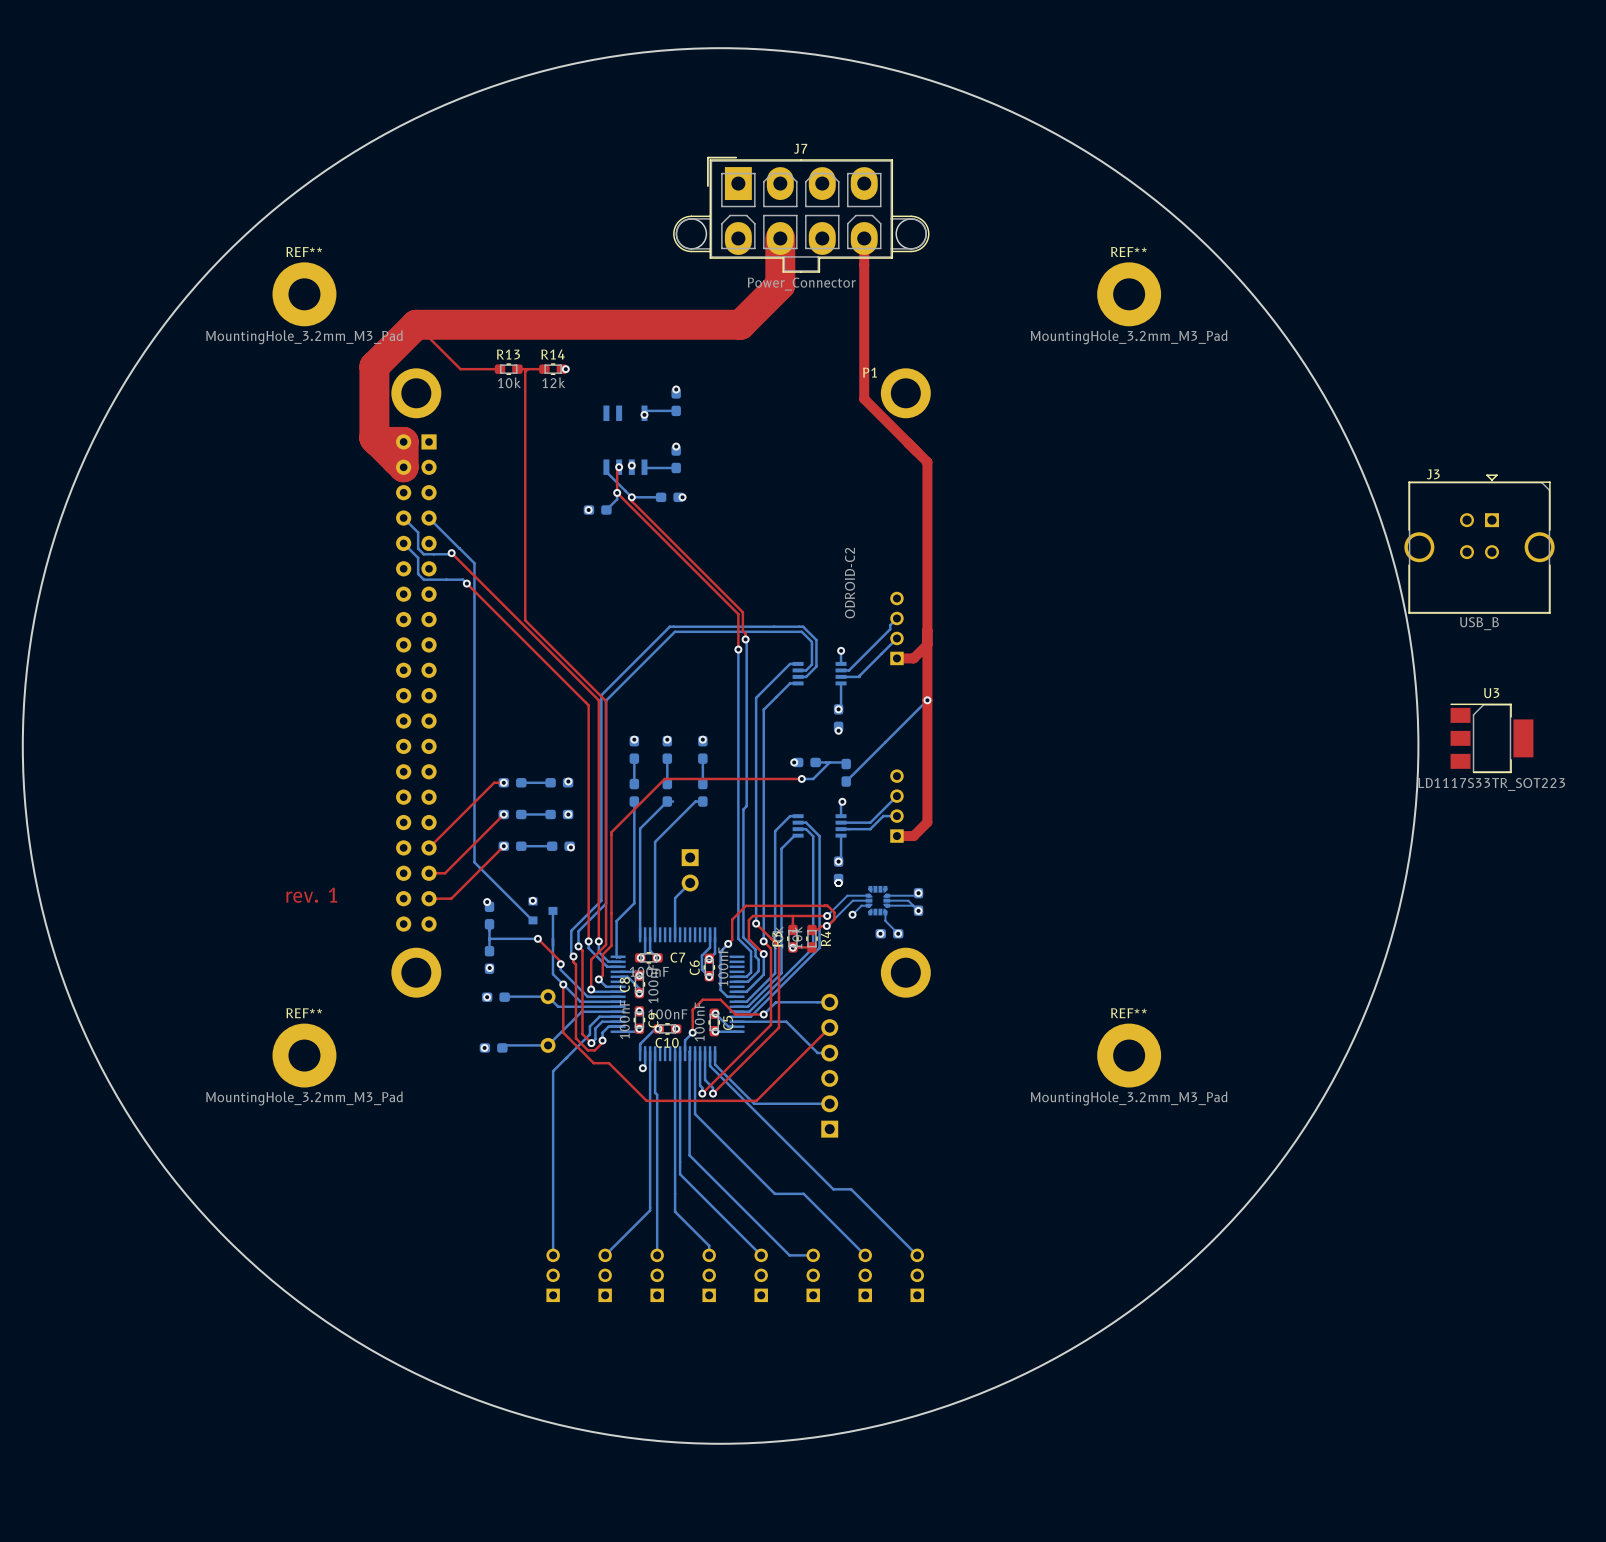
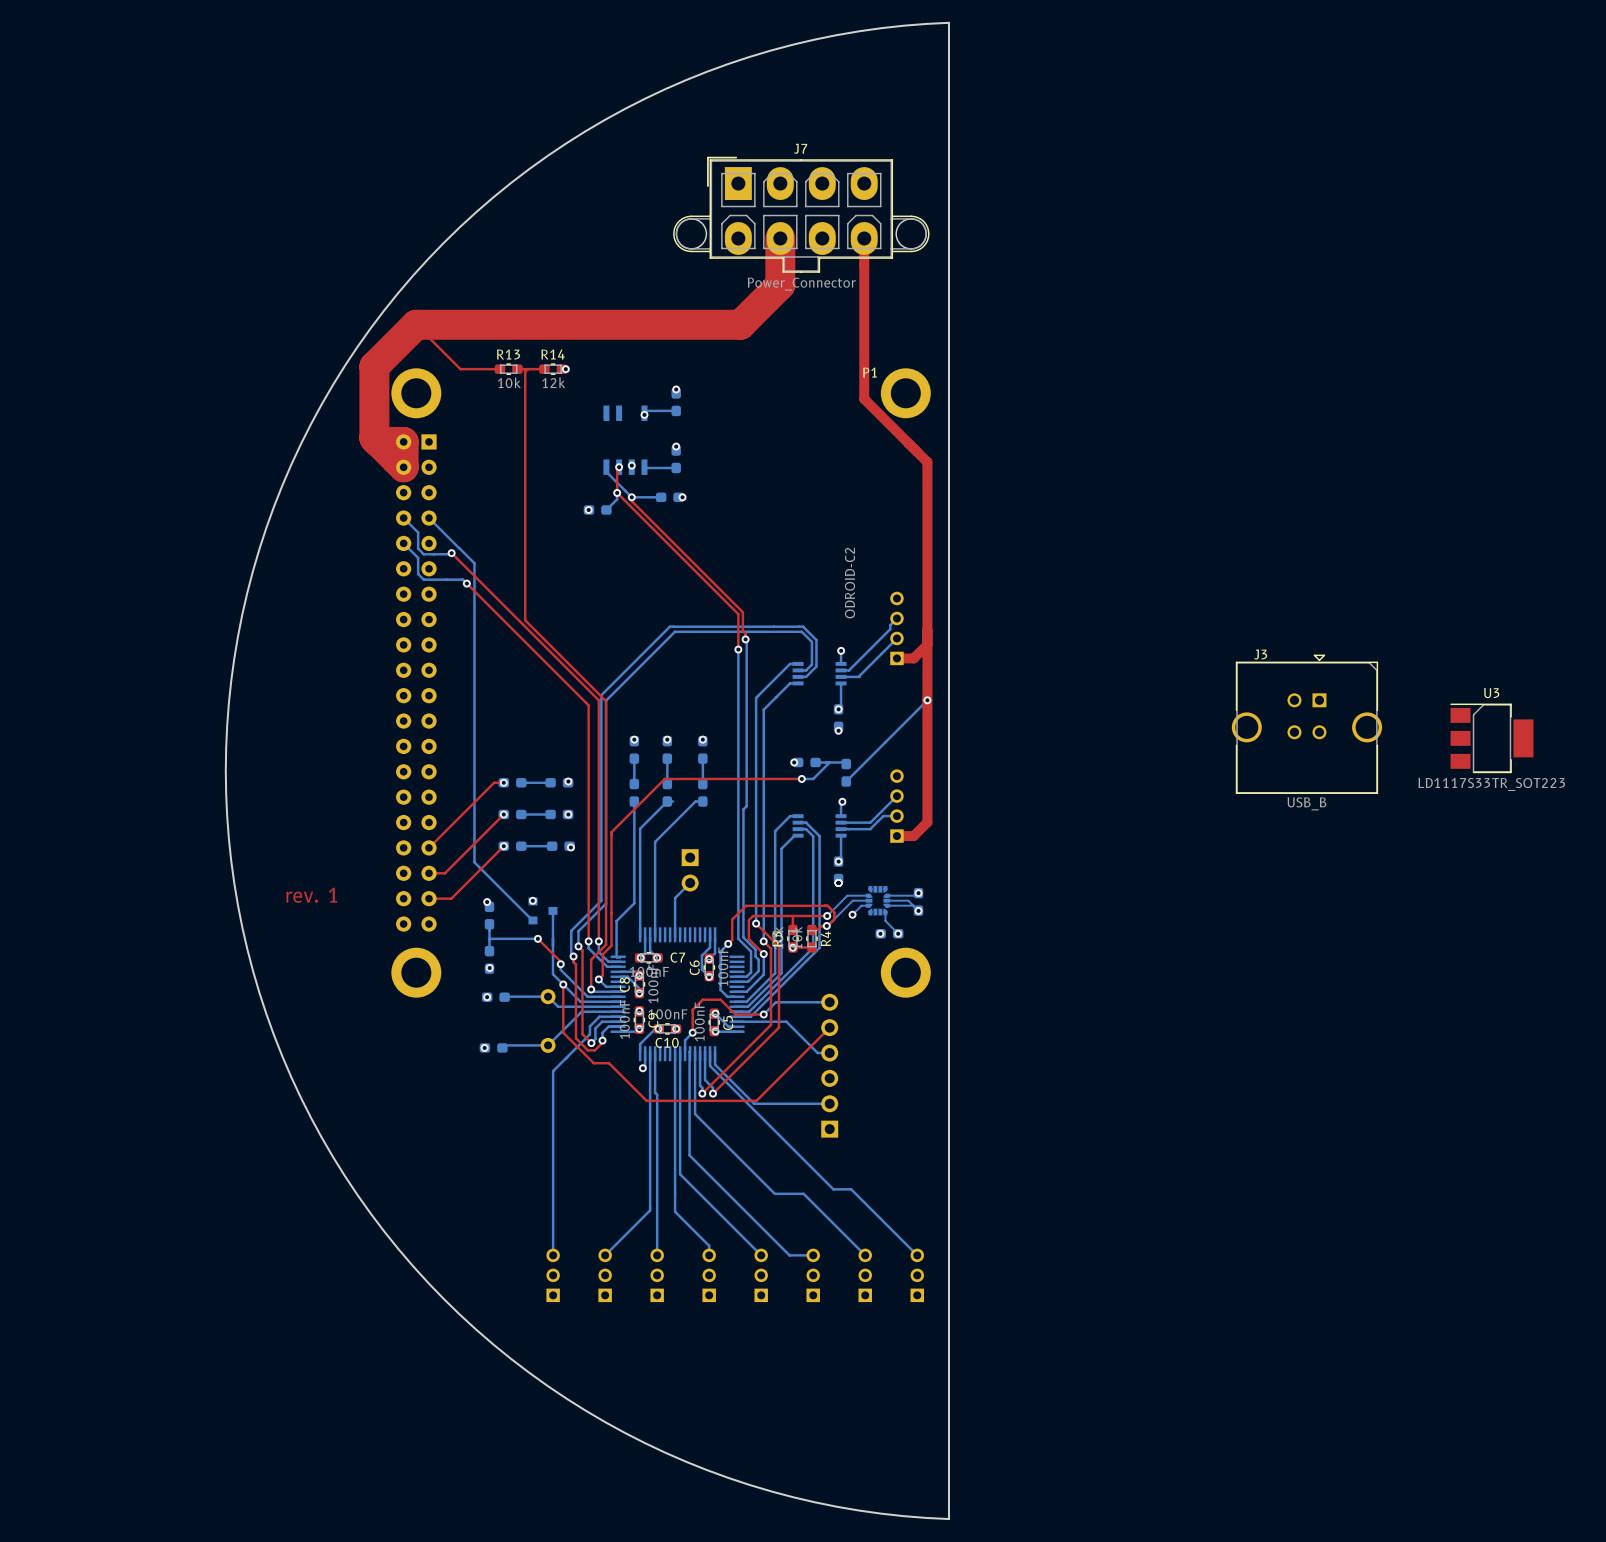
board edge: none -> (948, 22) (948, 1519) (859, 1510) (792, 1497) (728, 1477) (665, 1452) (604, 1421) (529, 1372) (476, 1330) (428, 1283) (370, 1213) (333, 1157) (300, 1097) (274, 1035) (253, 971) (238, 905) (228, 838) (225, 770) (228, 703) (238, 636) (253, 570) (274, 506) (300, 443) (345, 365) (384, 310) (428, 258) (476, 211) (529, 169) (585, 131) (665, 89) (749, 56) (814, 39) (881, 28) (926, 23) (948, 22)
round board edge: [21, 47, 1420, 1445] -> none
REF**: MountingHole_3.2mm_M3_Pad (304, 294) -> none
REF**: MountingHole_3.2mm_M3_Pad (1129, 294) -> none
J3 position: (1479, 544) -> (1306, 724)
REF**: MountingHole_3.2mm_M3_Pad (304, 1055) -> none
REF**: MountingHole_3.2mm_M3_Pad (1129, 1055) -> none

